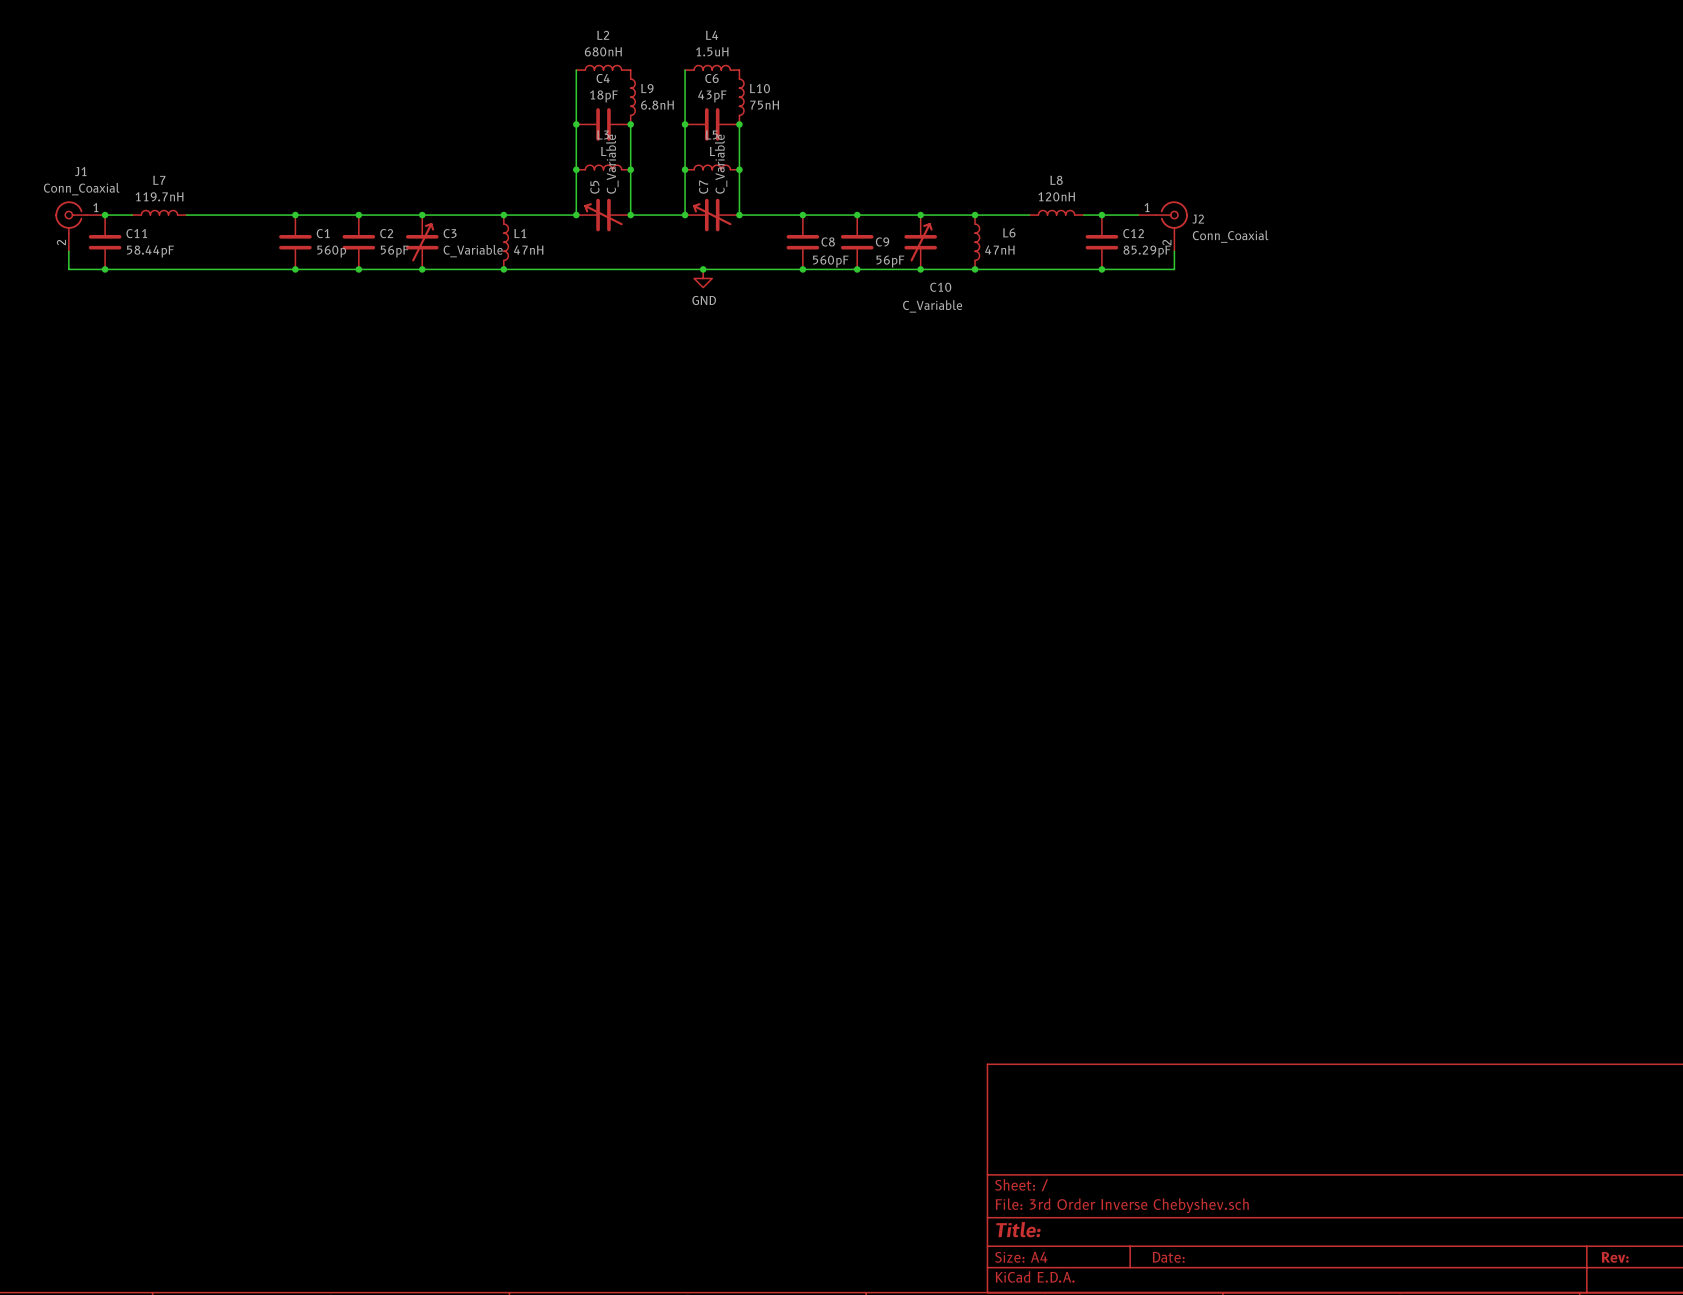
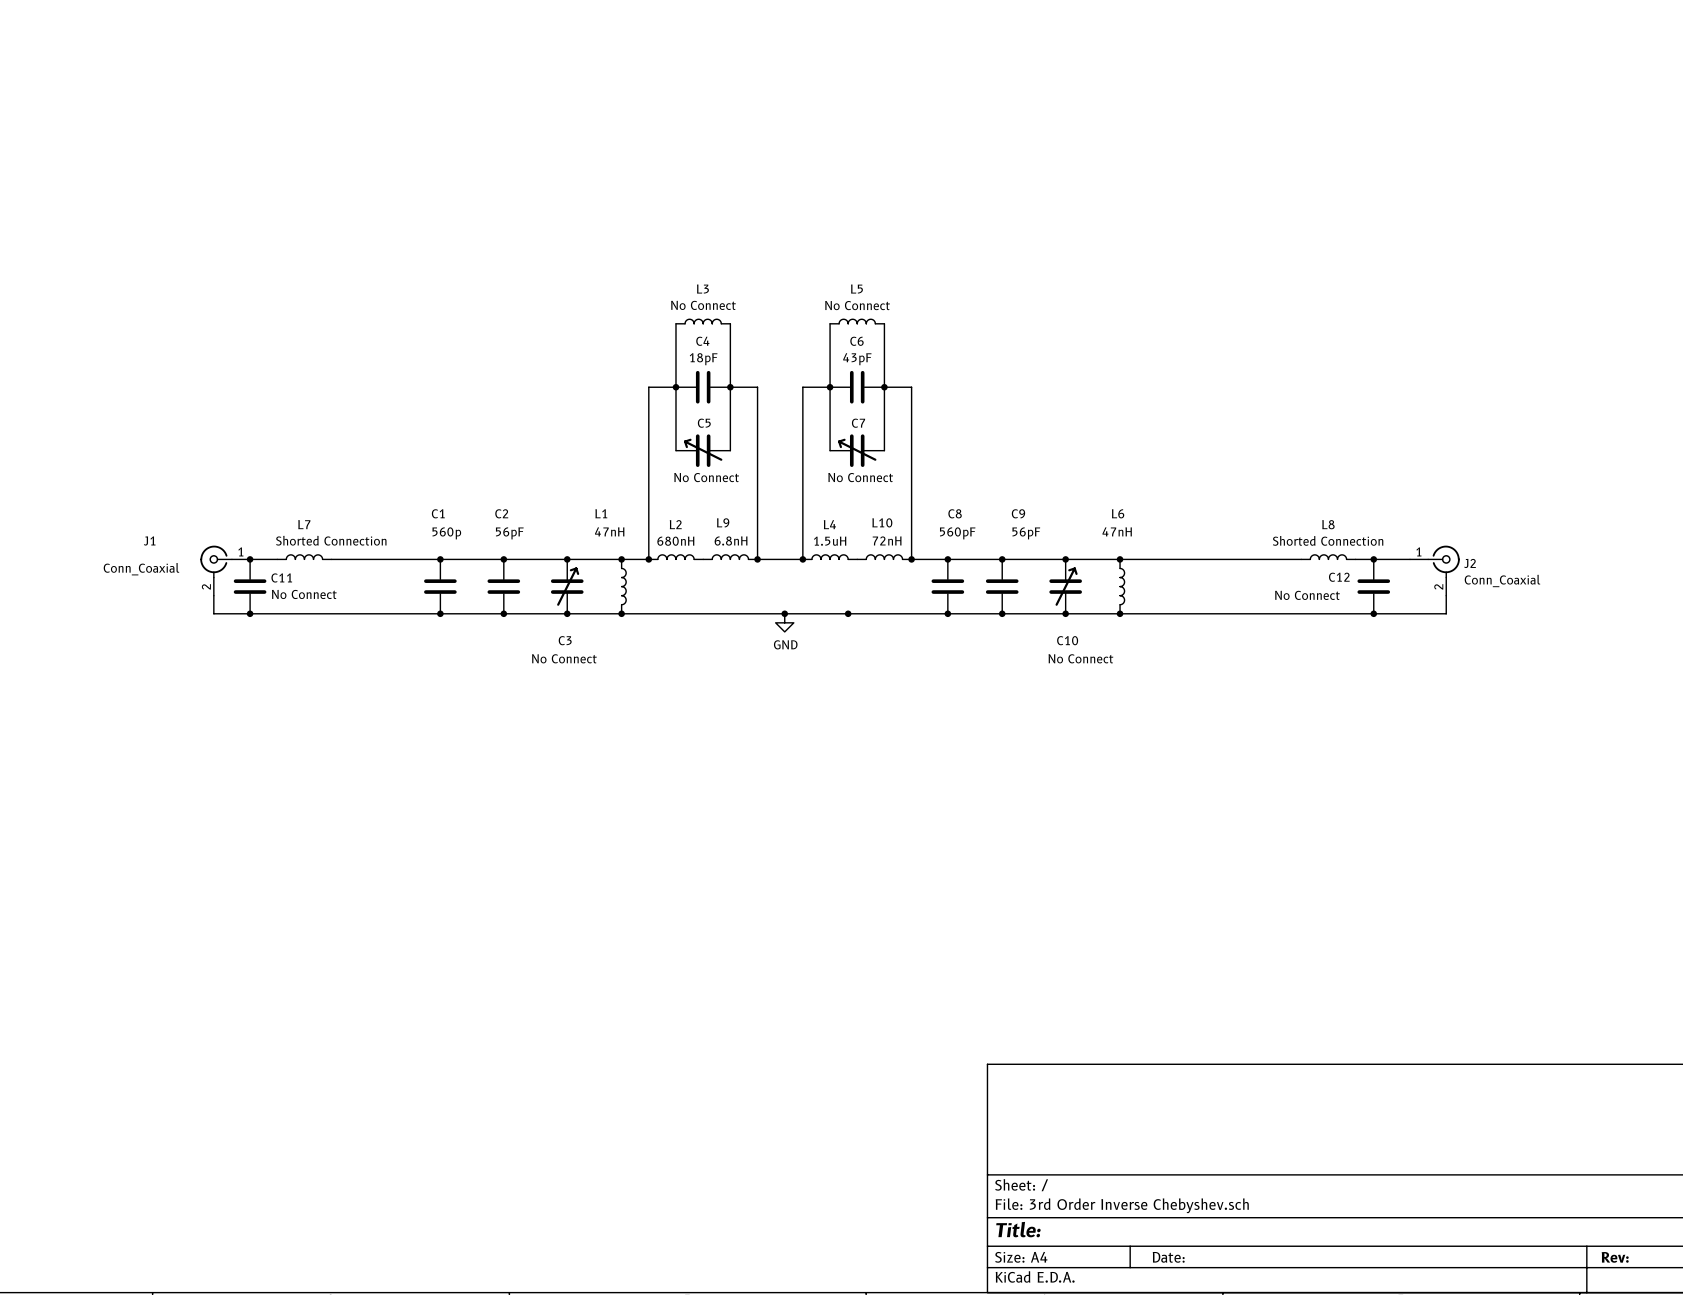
L2 position: (603, 67) -> (675, 557)
L4 position: (712, 67) -> (830, 557)
wire: (576, 70) (576, 215) (186, 215) -> none
wire: (685, 70) (685, 215) (630, 215) (630, 124) -> none
L9 name position: L9 (647, 88) -> L9 (723, 522)
L9 rotation: 0° (632, 97) -> 90° counterclockwise (730, 557)
L9 position: (632, 97) -> (730, 557)
L10 rotation: 0° (741, 97) -> 90° counterclockwise (884, 557)
L10 position: (741, 97) -> (884, 557)
L9 value position: 6.8nH (657, 105) -> 6.8nH (731, 541)
L10 value: 75nH (764, 105) -> 72nH (887, 540)
junction: (576, 124) -> none
C4 position: (603, 124) -> (703, 387)
junction: (630, 124) -> none
junction: (685, 124) -> none
C6 position: (712, 124) -> (857, 387)
wire: (739, 124) (739, 215) (1029, 215) -> none
junction: (739, 124) -> none
L3 value: L (603, 151) -> No Connect (703, 305)
L5 value: L (712, 151) -> No Connect (857, 305)
C5 value: C_Variable (612, 164) -> No Connect (706, 477)
C7 value: C_Variable (721, 164) -> No Connect (860, 477)
L3 position: (603, 167) -> (703, 321)
L5 position: (712, 167) -> (857, 321)
junction: (576, 169) -> none
junction: (630, 169) -> none
junction: (685, 169) -> none
junction: (739, 169) -> none
J1 name position: J1 (80, 171) -> J1 (149, 541)
C5 name rotation: 0° (594, 187) -> 90° clockwise (704, 423)
C7 name rotation: 0° (703, 187) -> 90° clockwise (858, 423)
J1 value position: Conn_Coaxial (81, 189) -> Conn_Coaxial (141, 569)
L7 value: 119.7nH (159, 196) -> Shorted Connection (331, 540)
L8 value: 120nH (1056, 196) -> Shorted Connection (1328, 540)
L7 position: (159, 212) -> (304, 557)
L8 position: (1056, 212) -> (1328, 557)
wire: (105, 215) (132, 215) -> none
junction: (105, 215) -> none
junction: (295, 215) -> none
junction: (358, 215) -> none
junction: (422, 215) -> none
junction: (503, 215) -> none
junction: (576, 215) -> none
C5 position: (603, 215) -> (703, 450)
junction: (630, 215) -> none
junction: (685, 215) -> none
C7 position: (712, 215) -> (857, 450)
junction: (739, 215) -> none
junction: (802, 215) -> none
junction: (857, 215) -> none
junction: (920, 215) -> none
junction: (975, 215) -> none
wire: (1083, 215) (1138, 215) -> none
junction: (1101, 215) -> none
J1 position: (80, 226) -> (225, 570)
J2 position: (1163, 226) -> (1434, 570)
L6 name position: L6 (1009, 232) -> L6 (1118, 513)
C1 name position: C1 (323, 233) -> C1 (438, 513)
C2 name position: C2 (386, 233) -> C2 (501, 513)
C3 name position: C3 (450, 233) -> C3 (565, 640)
L1 name position: L1 (520, 233) -> L1 (601, 513)
C12 name position: C12 (1133, 233) -> C12 (1339, 577)
C8 name position: C8 (828, 241) -> C8 (955, 513)
C9 name position: C9 (882, 241) -> C9 (1018, 513)
C11 position: (105, 242) -> (250, 586)
C1 position: (295, 242) -> (440, 586)
C2 position: (358, 242) -> (503, 586)
C3 position: (422, 242) -> (567, 586)
L1 position: (506, 242) -> (623, 586)
C8 position: (802, 242) -> (947, 586)
C9 position: (857, 242) -> (1002, 586)
C10 position: (920, 242) -> (1065, 586)
L6 position: (977, 242) -> (1122, 586)
C12 position: (1101, 242) -> (1373, 586)
L1 value position: 47nH (528, 250) -> 47nH (609, 531)
L6 value position: 47nH (999, 250) -> 47nH (1117, 531)
wire: (68, 251) (68, 269) (1174, 269) (1174, 251) -> none
C11 value: 58.44pF (150, 251) -> No Connect (304, 594)
C1 value position: 560p (331, 251) -> 560p (446, 533)
C2 value position: 56pF (394, 251) -> 56pF (509, 533)
C3 value: C_Variable (473, 251) -> No Connect (564, 658)
C12 value: 85.29pF (1147, 251) -> No Connect (1307, 595)
C8 value position: 560pF (830, 261) -> 560pF (957, 533)
C9 value position: 56pF (890, 261) -> 56pF (1026, 533)
junction: (105, 269) -> none
junction: (295, 269) -> none
junction: (358, 269) -> none
junction: (422, 269) -> none
junction: (503, 269) -> none
junction: (703, 269) -> none
junction: (802, 269) -> none
junction: (857, 269) -> none
junction: (920, 269) -> none
junction: (975, 269) -> none
junction: (1101, 269) -> none
power symbol: GND (703, 278) -> none
C10 name position: C10 (940, 287) -> C10 (1067, 640)
C10 value: C_Variable (932, 306) -> No Connect (1080, 658)
wire: none -> (675, 323) (675, 450)
wire: none -> (730, 323) (730, 450)
wire: none -> (830, 323) (830, 450)
wire: none -> (884, 323) (884, 450)
wire: none -> (675, 387) (648, 387) (648, 559) (331, 559)
junction: none -> (675, 387)
wire: none -> (730, 387) (757, 387) (757, 559) (802, 559) (802, 387) (830, 387)
junction: none -> (730, 387)
junction: none -> (830, 387)
wire: none -> (884, 387) (911, 387) (911, 559) (1301, 559)
junction: none -> (884, 387)
wire: none -> (250, 559) (277, 559)
junction: none -> (250, 559)
junction: none -> (440, 559)
junction: none -> (503, 559)
junction: none -> (567, 559)
junction: none -> (621, 559)
junction: none -> (648, 559)
junction: none -> (757, 559)
junction: none -> (802, 559)
junction: none -> (911, 559)
junction: none -> (947, 559)
junction: none -> (1002, 559)
junction: none -> (1065, 559)
junction: none -> (1120, 559)
wire: none -> (1355, 559) (1410, 559)
junction: none -> (1373, 559)
wire: none -> (213, 595) (213, 613) (1446, 613) (1446, 595)
junction: none -> (250, 613)
junction: none -> (440, 613)
junction: none -> (503, 613)
junction: none -> (567, 613)
junction: none -> (621, 613)
junction: none -> (784, 613)
junction: none -> (848, 613)
junction: none -> (947, 613)
junction: none -> (1002, 613)
junction: none -> (1065, 613)
junction: none -> (1120, 613)
junction: none -> (1373, 613)
power symbol: none -> GND (784, 622)

